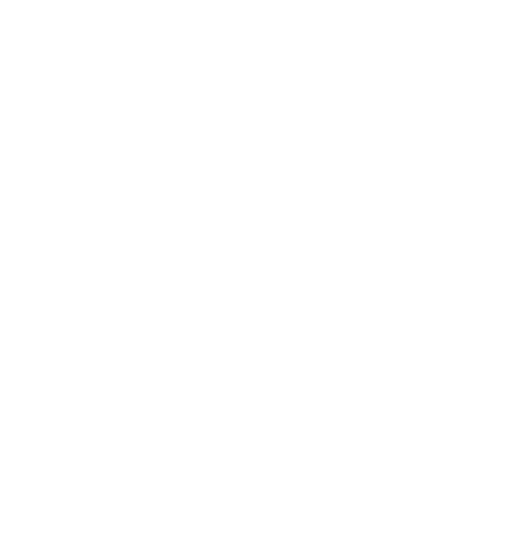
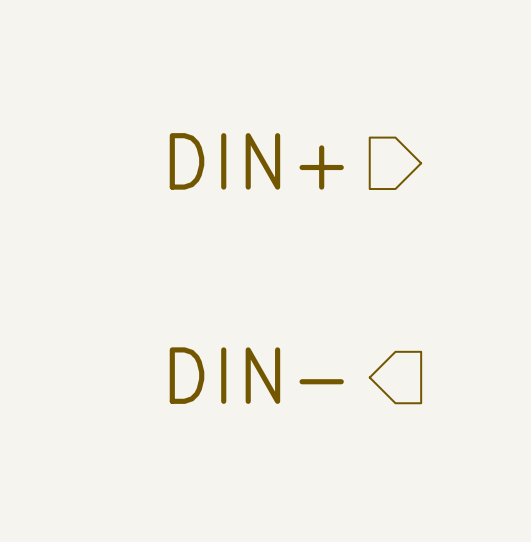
hierarchical label: none -> DIN+ (256, 161)
hierarchical label: none -> DIN- (256, 375)

